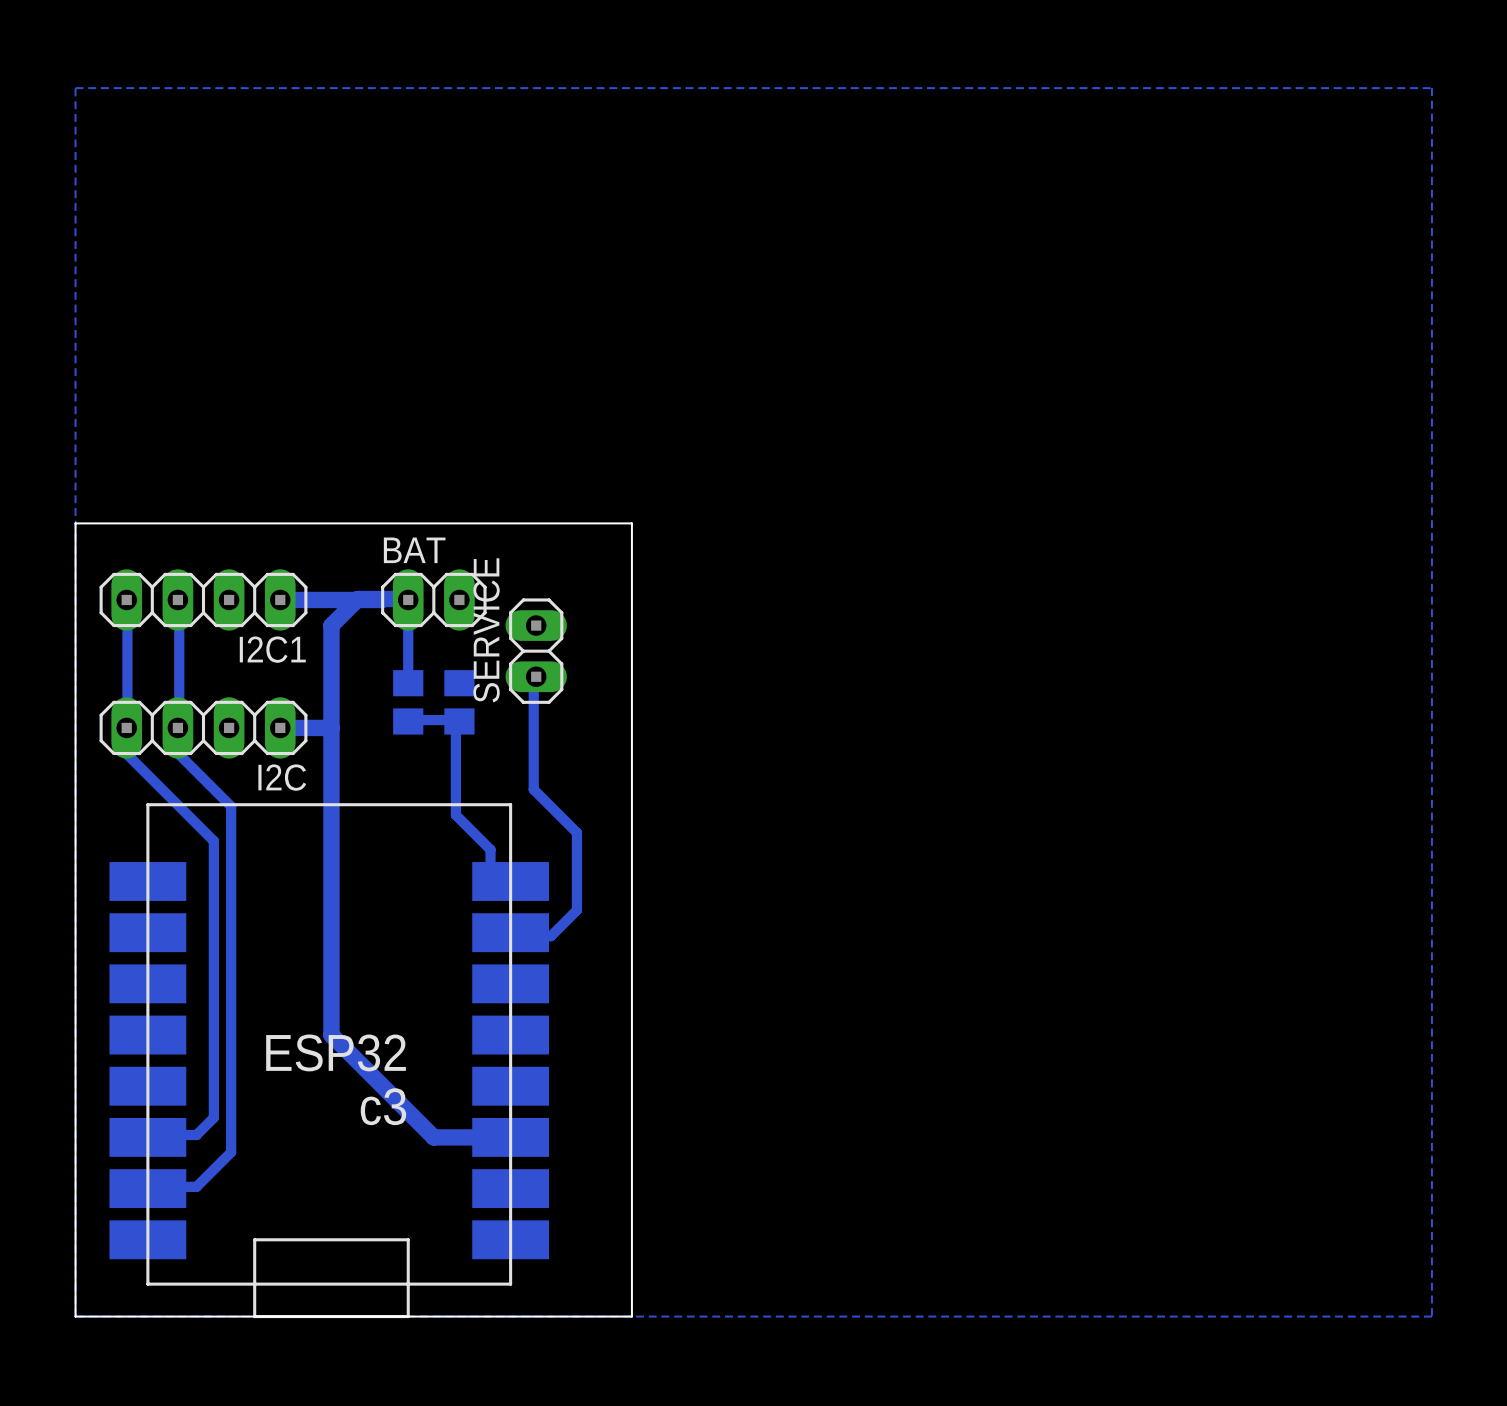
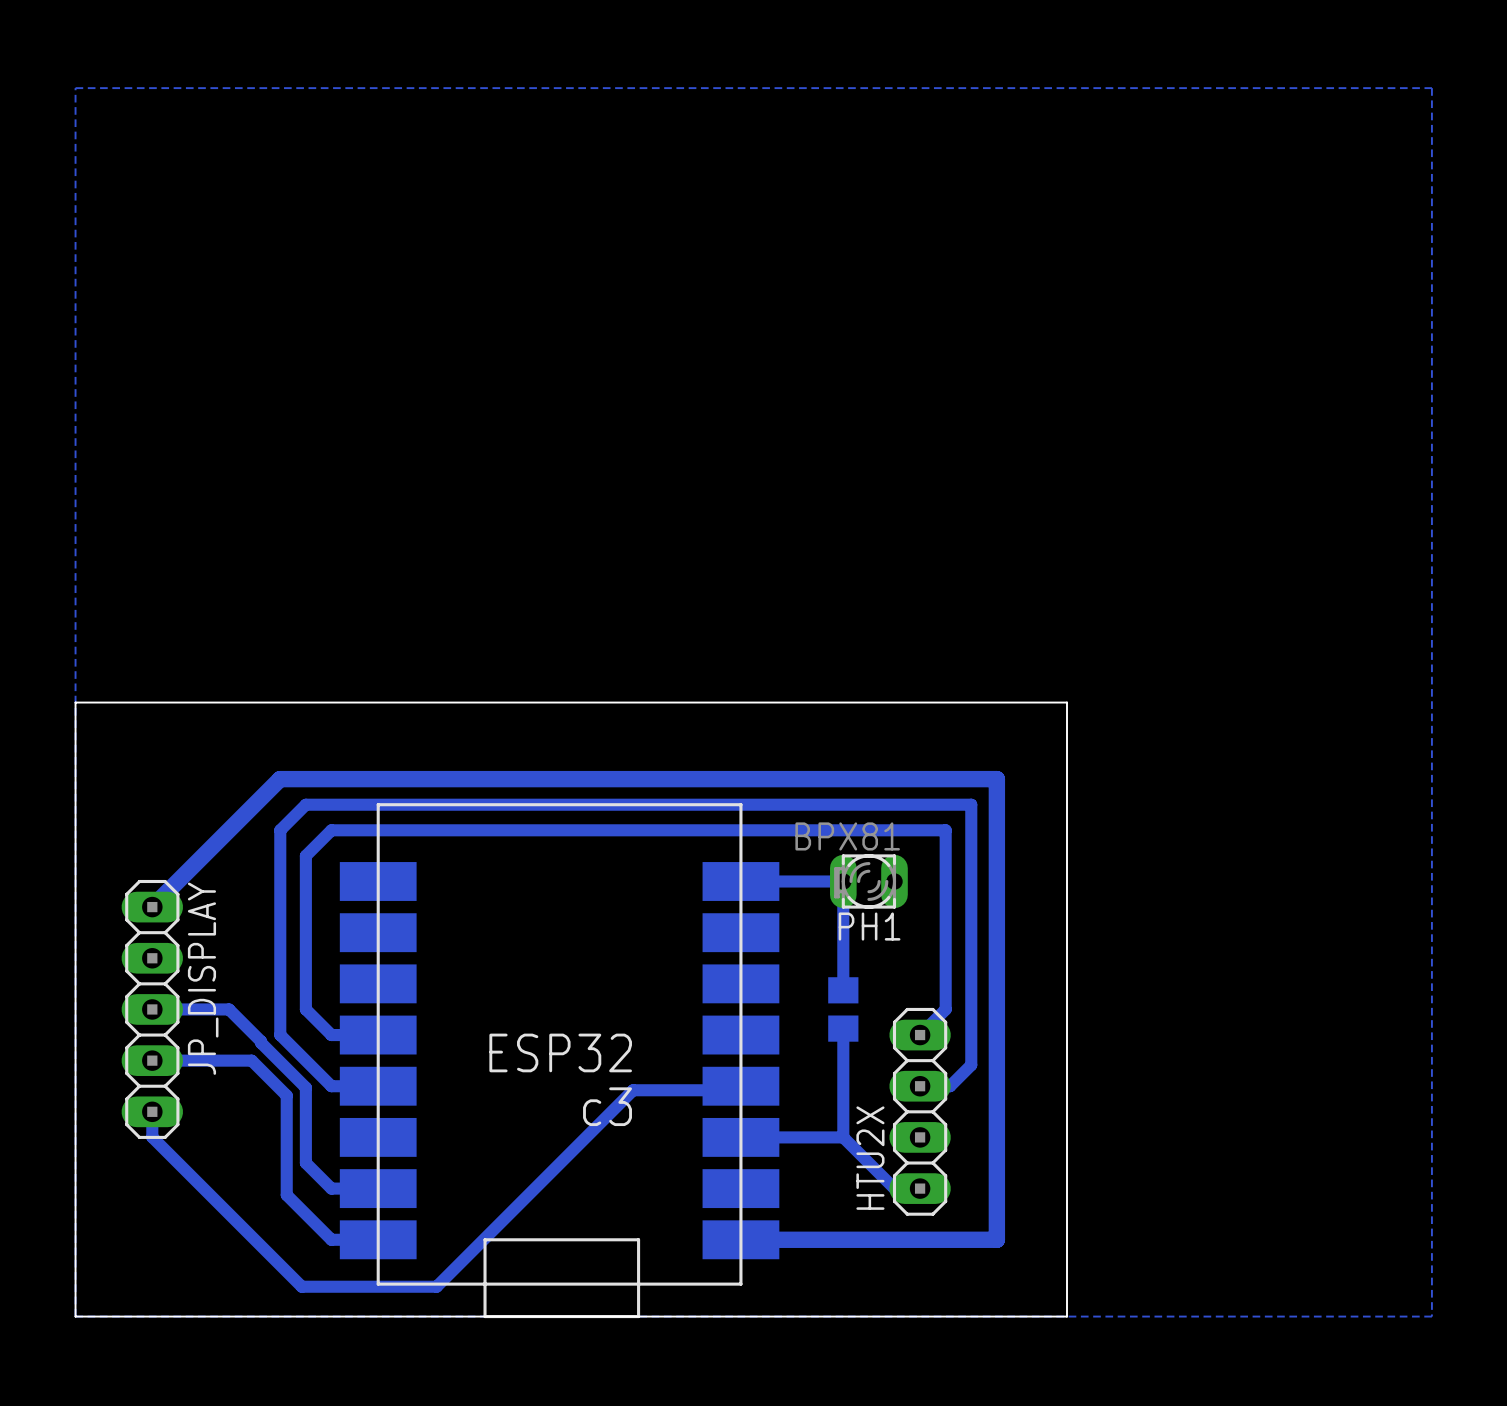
bottom track: (126, 599) (127, 754) (213, 841) (213, 1117) (196, 1135) (153, 1135) (147, 1137) -> none
bottom track: (177, 599) (179, 754) (231, 806) (231, 1152) (196, 1186) (153, 1186) (147, 1188) -> none
I2C1: (203, 599) -> none
bottom track: (382, 599) (280, 599) -> none
BAT: (433, 599) -> none
SERVICE: (536, 651) -> none
bottom track: (536, 676) (533, 676) (533, 789) (576, 832) (576, 910) (551, 936) (516, 936) (510, 932) -> none
bottom track: (408, 683) (408, 599) (358, 599) (331, 625) (331, 1035) (433, 1137) (510, 1137) -> none
board edge: (75, 702) (75, 523) (631, 523) (631, 1316) -> (75, 702) (1067, 702) (1067, 1316) (631, 1316)
part: (408, 702) -> none
part: (459, 702) -> none
bottom track: (408, 721) (459, 721) (455, 728) (455, 815) (490, 849) (490, 875) (499, 884) (507, 884) (510, 881) -> none
I2C: (203, 727) -> none
bottom track: (280, 727) (331, 727) -> none
bottom track: none -> (740, 881) (843, 881) (843, 990)
PH1: none -> BPX81 (868, 881)
bottom track: none -> (152, 907) (150, 908) (280, 779) (996, 779) (996, 1239) (740, 1239)
bottom track: none -> (152, 1009) (229, 1009) (305, 1087) (305, 1163) (331, 1188) (373, 1188) (376, 1185)
JP_DISPLAY: none -> (152, 1009)
part: none -> (843, 1009)
bottom track: none -> (843, 1028) (843, 1137)
bottom track: none -> (378, 1035) (331, 1035) (305, 1009) (305, 855) (331, 830) (945, 830) (945, 1009) (920, 1035)
bottom track: none -> (152, 1060) (251, 1060) (286, 1095) (286, 1195) (331, 1239) (378, 1239) (378, 1236) (352, 1236)
part position: (329, 1060) -> (559, 1060)
bottom track: none -> (378, 1086) (331, 1086) (280, 1035) (280, 830) (305, 804) (971, 804) (971, 1065) (950, 1086) (920, 1086)
bottom track: none -> (740, 1086) (736, 1090) (633, 1090) (436, 1286) (301, 1286) (152, 1137) (152, 1111)
HTU2X: none -> (920, 1111)
bottom track: none -> (740, 1137) (843, 1137)
bottom track: none -> (843, 1137) (894, 1188) (920, 1188)

